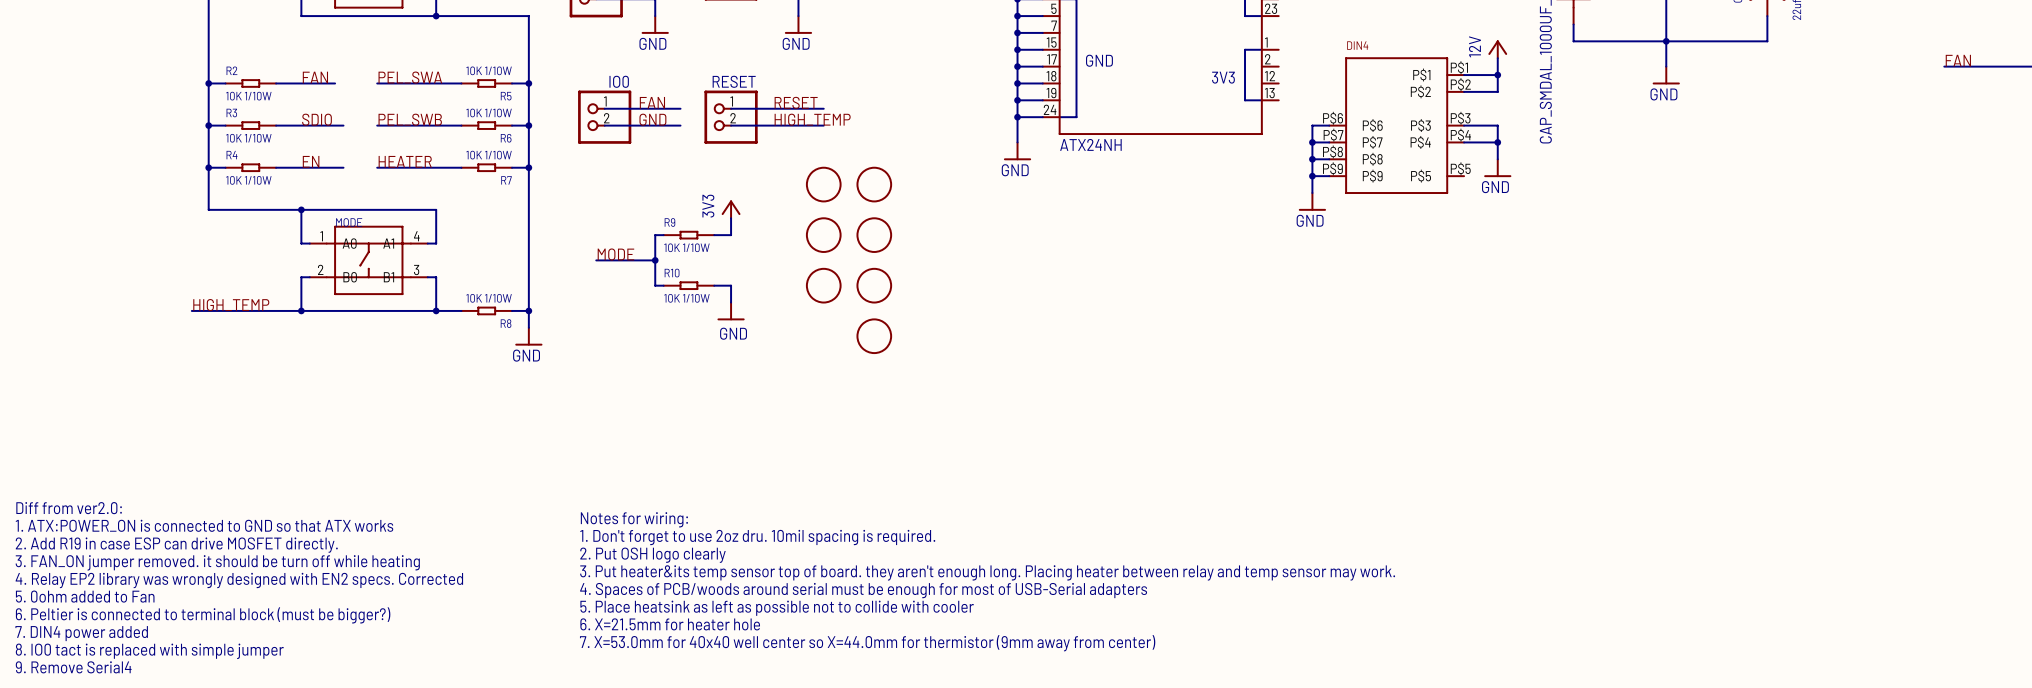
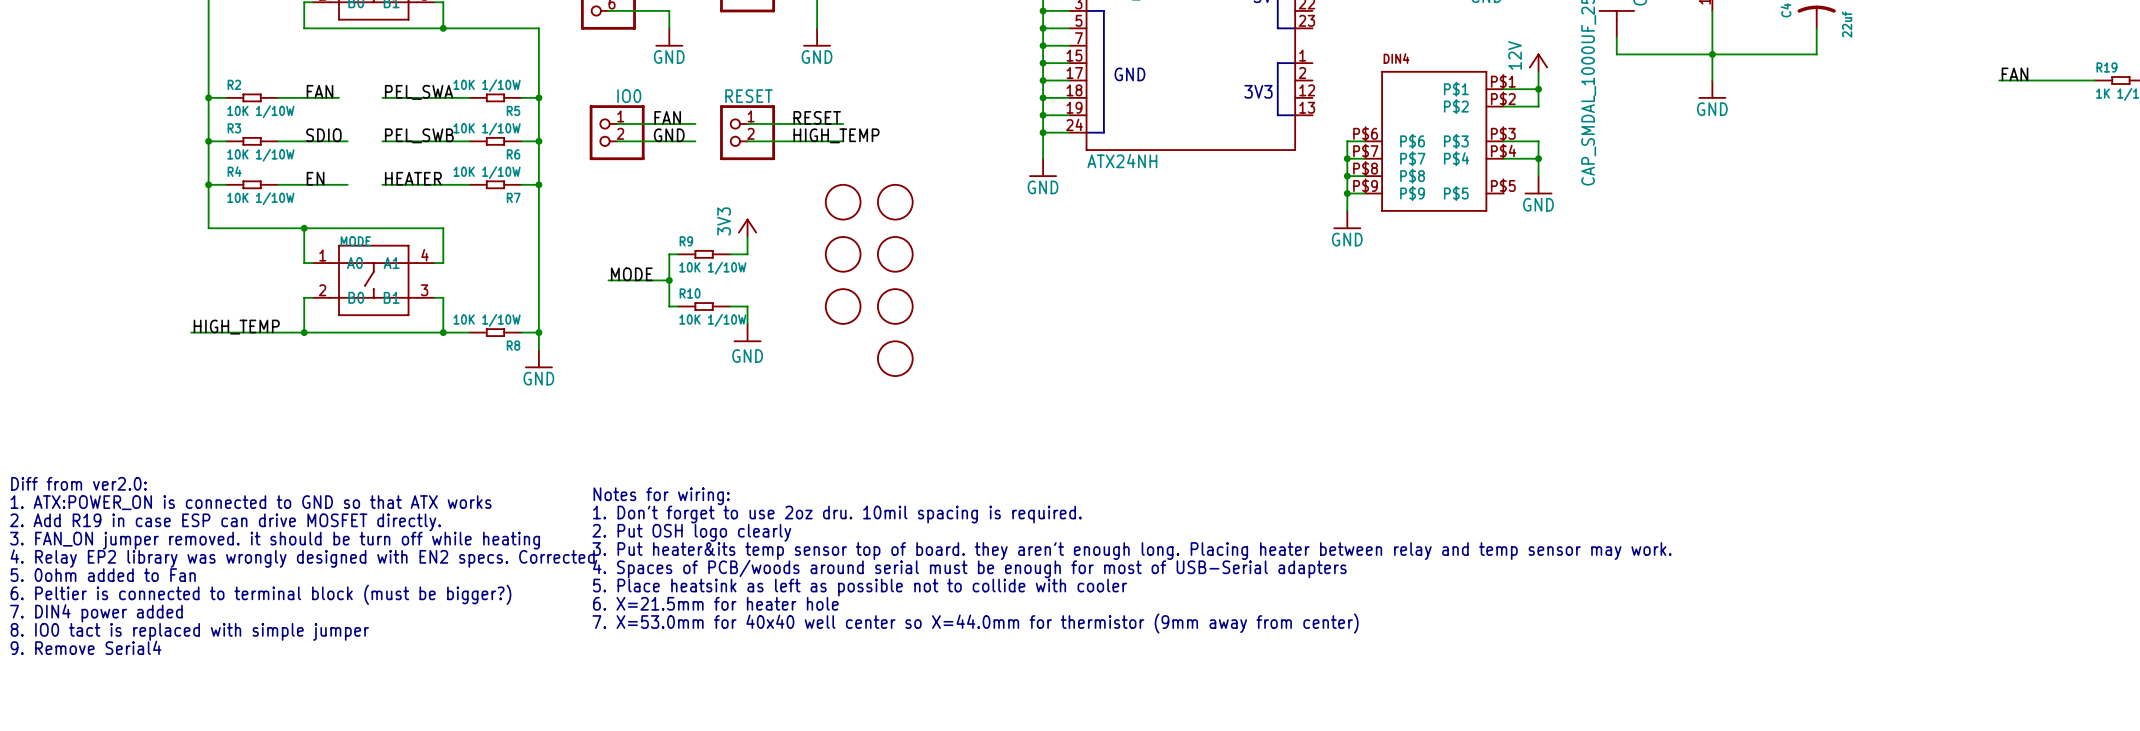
text position: Diff from ver2.0: (69, 508) -> Diff from ver2.0: (78, 483)
text position: Notes for wiring: (634, 519) -> Notes for wiring: (661, 496)
text position: 1. ATX:POWER_ON is connected to GND so that ATX works (204, 525) -> 1. ATX:POWER_ON is connected to GND so that ATX works (251, 502)
text position: 1. Don't forget to use 2oz dru. 10mil spacing is required. (757, 537) -> 1. Don't forget to use 2oz dru. 10mil spacing is required. (837, 514)
text position: 2. Add R19 in case ESP can drive MOSFET directly. (176, 545) -> 2. Add R19 in case ESP can drive MOSFET directly. (225, 522)
text position: 2. Put OSH logo clearly (652, 555) -> 2. Put OSH logo clearly (691, 532)
text position: 3. FAN_ON jumper removed. it should be turn off while heating (217, 562) -> 3. FAN_ON jumper removed. it should be turn off while heating (275, 540)
text position: 3. Put heater&its temp sensor top of board. they aren't enough long. Placing heater between relay and temp sensor may work. (987, 572) -> 3. Put heater&its temp sensor top of board. they aren't enough long. Placing heater between relay and temp sensor may work. (1132, 551)
text position: 4. Relay EP2 library was wrongly designed with EN2 specs. Corrected (239, 580) -> 4. Relay EP2 library was wrongly designed with EN2 specs. Corrected (302, 558)
text position: 4. Spaces of PCB/woods around serial must be enough for most of USB-Serial adapters (863, 590) -> 4. Spaces of PCB/woods around serial must be enough for most of USB-Serial adapters (969, 569)
text position: 5. 0ohm added to Fan (85, 596) -> 5. 0ohm added to Fan (103, 575)
text position: 5. Place heatsink as left as possible not to collide with cooler (777, 608) -> 5. Place heatsink as left as possible not to collide with cooler (860, 587)
text position: 6. Peltier is connected to terminal block (must be bigger?) (203, 615) -> 6. Peltier is connected to terminal block (must be bigger?) (260, 594)
text position: 6. X=21.5mm for heater hole (670, 624) -> 6. X=21.5mm for heater hole (715, 603)
text position: 7. DIN4 power added (81, 633) -> 7. DIN4 power added (96, 613)
text position: 7. X=53.0mm for 40x40 well center so X=44.0mm for thermistor (9mm away from center) (867, 643) -> 7. X=53.0mm for 40x40 well center so X=44.0mm for thermistor (9mm away from center) (975, 623)
text position: 8. IO0 tact is replaced with simple jumper (149, 651) -> 8. IO0 tact is replaced with simple jumper (189, 631)
text position: 9. Remove Serial4 (73, 667) -> 9. Remove Serial4 (86, 647)

